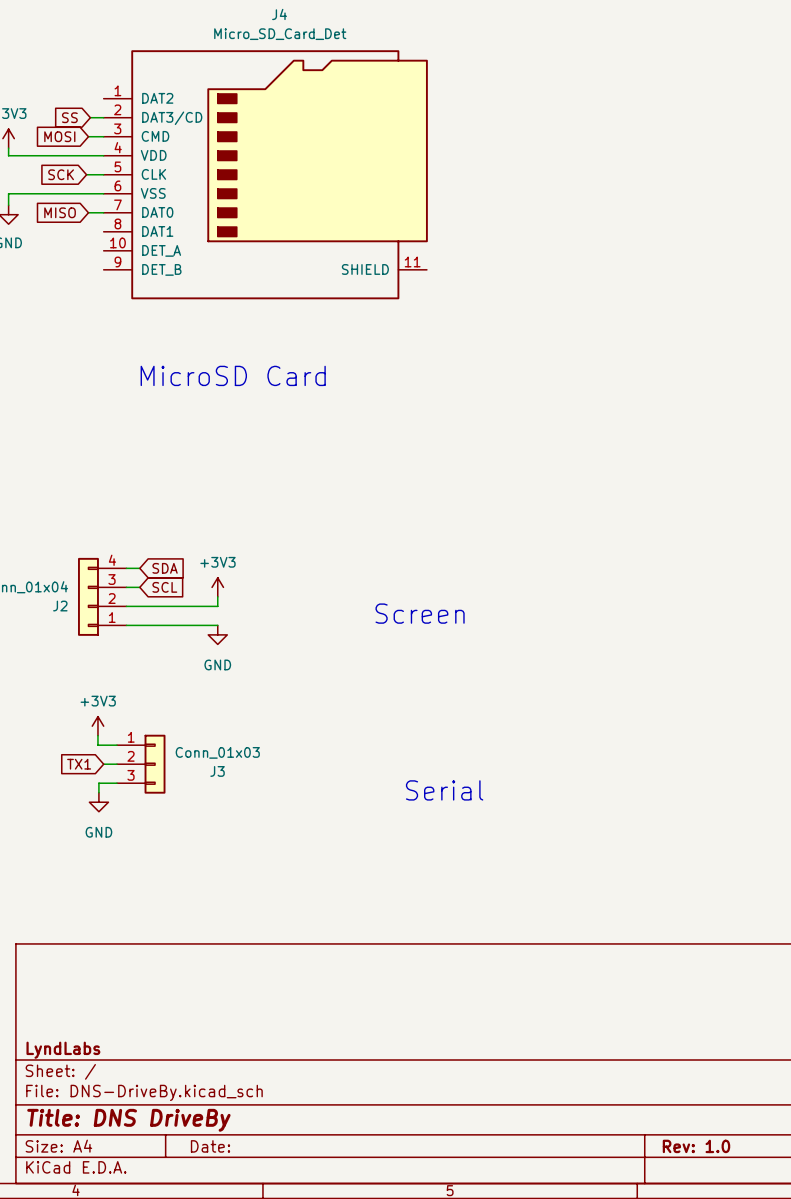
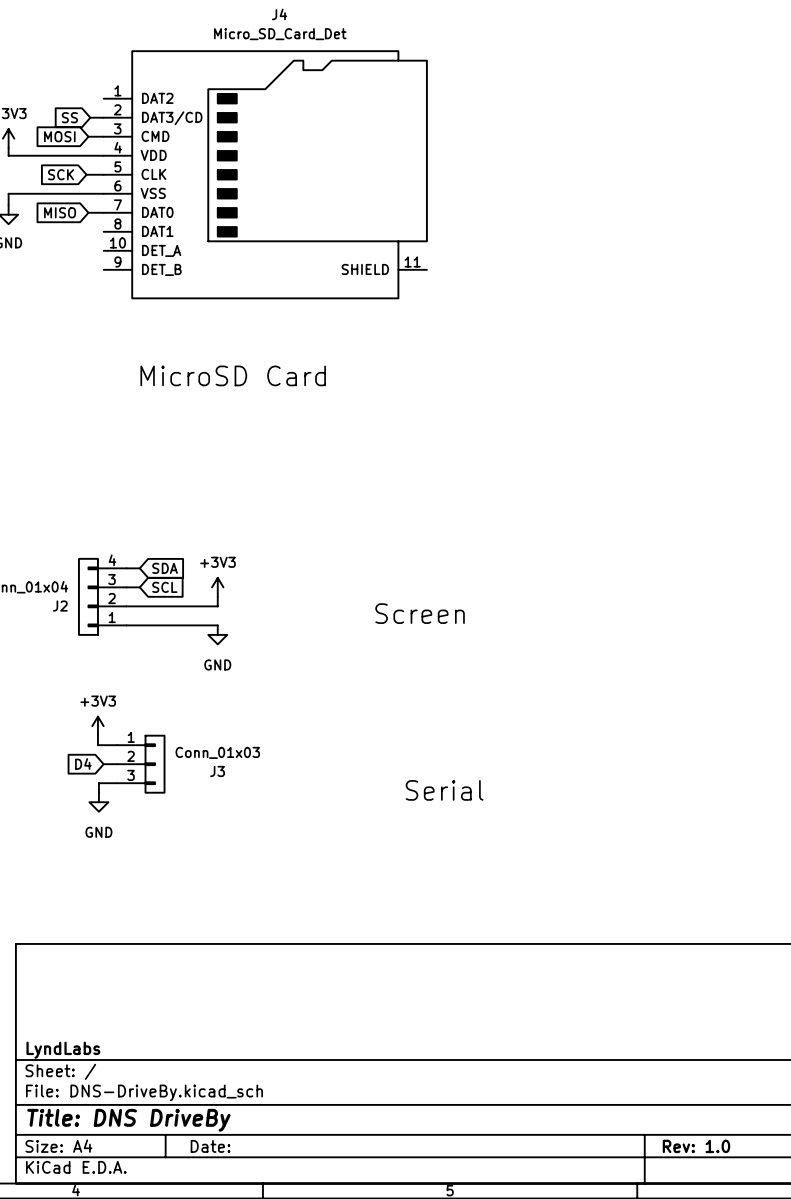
global label: TX1 (79, 764) -> D4 (83, 763)

